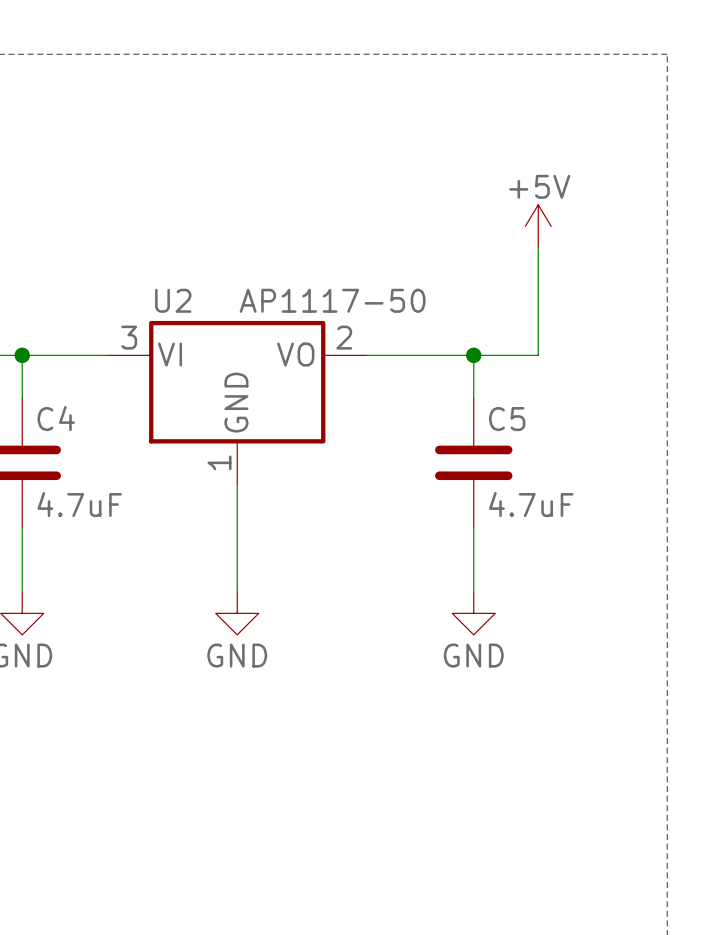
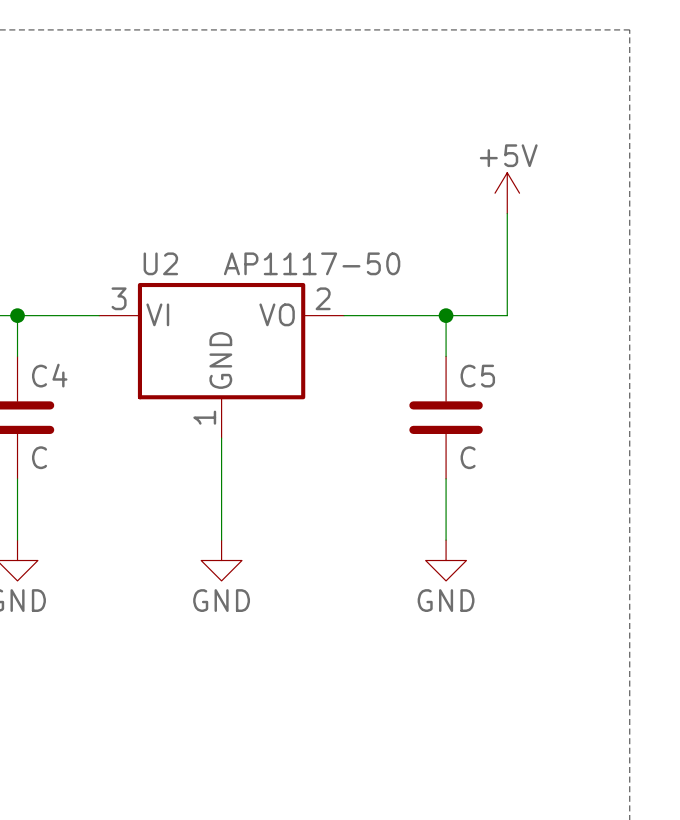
C4 value: 4.7uF (79, 504) -> C (39, 457)
C5 value: 4.7uF (531, 504) -> C (468, 457)

